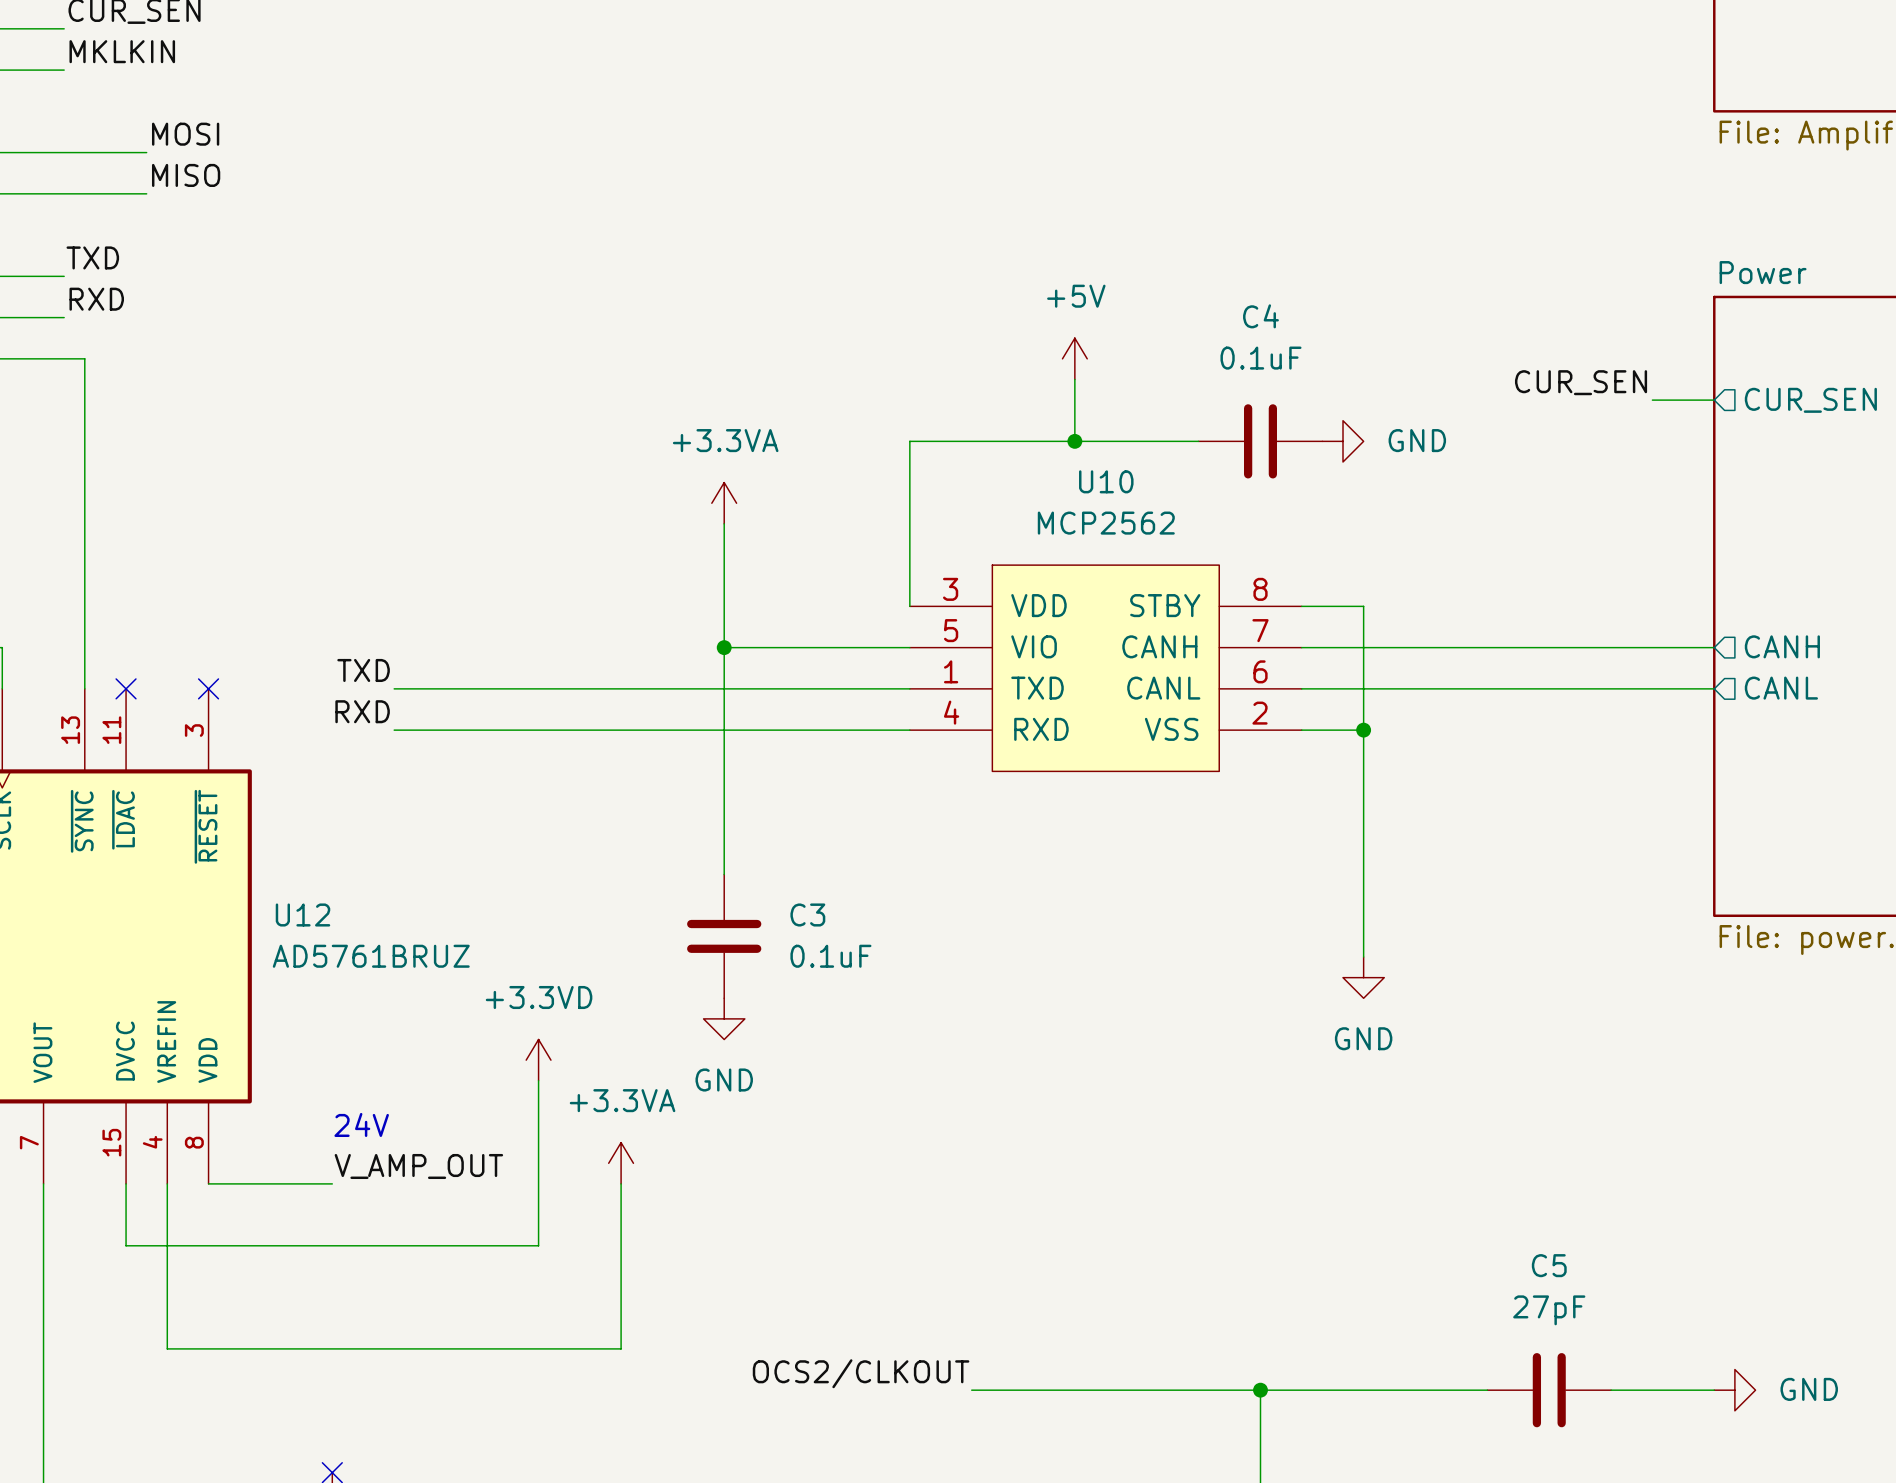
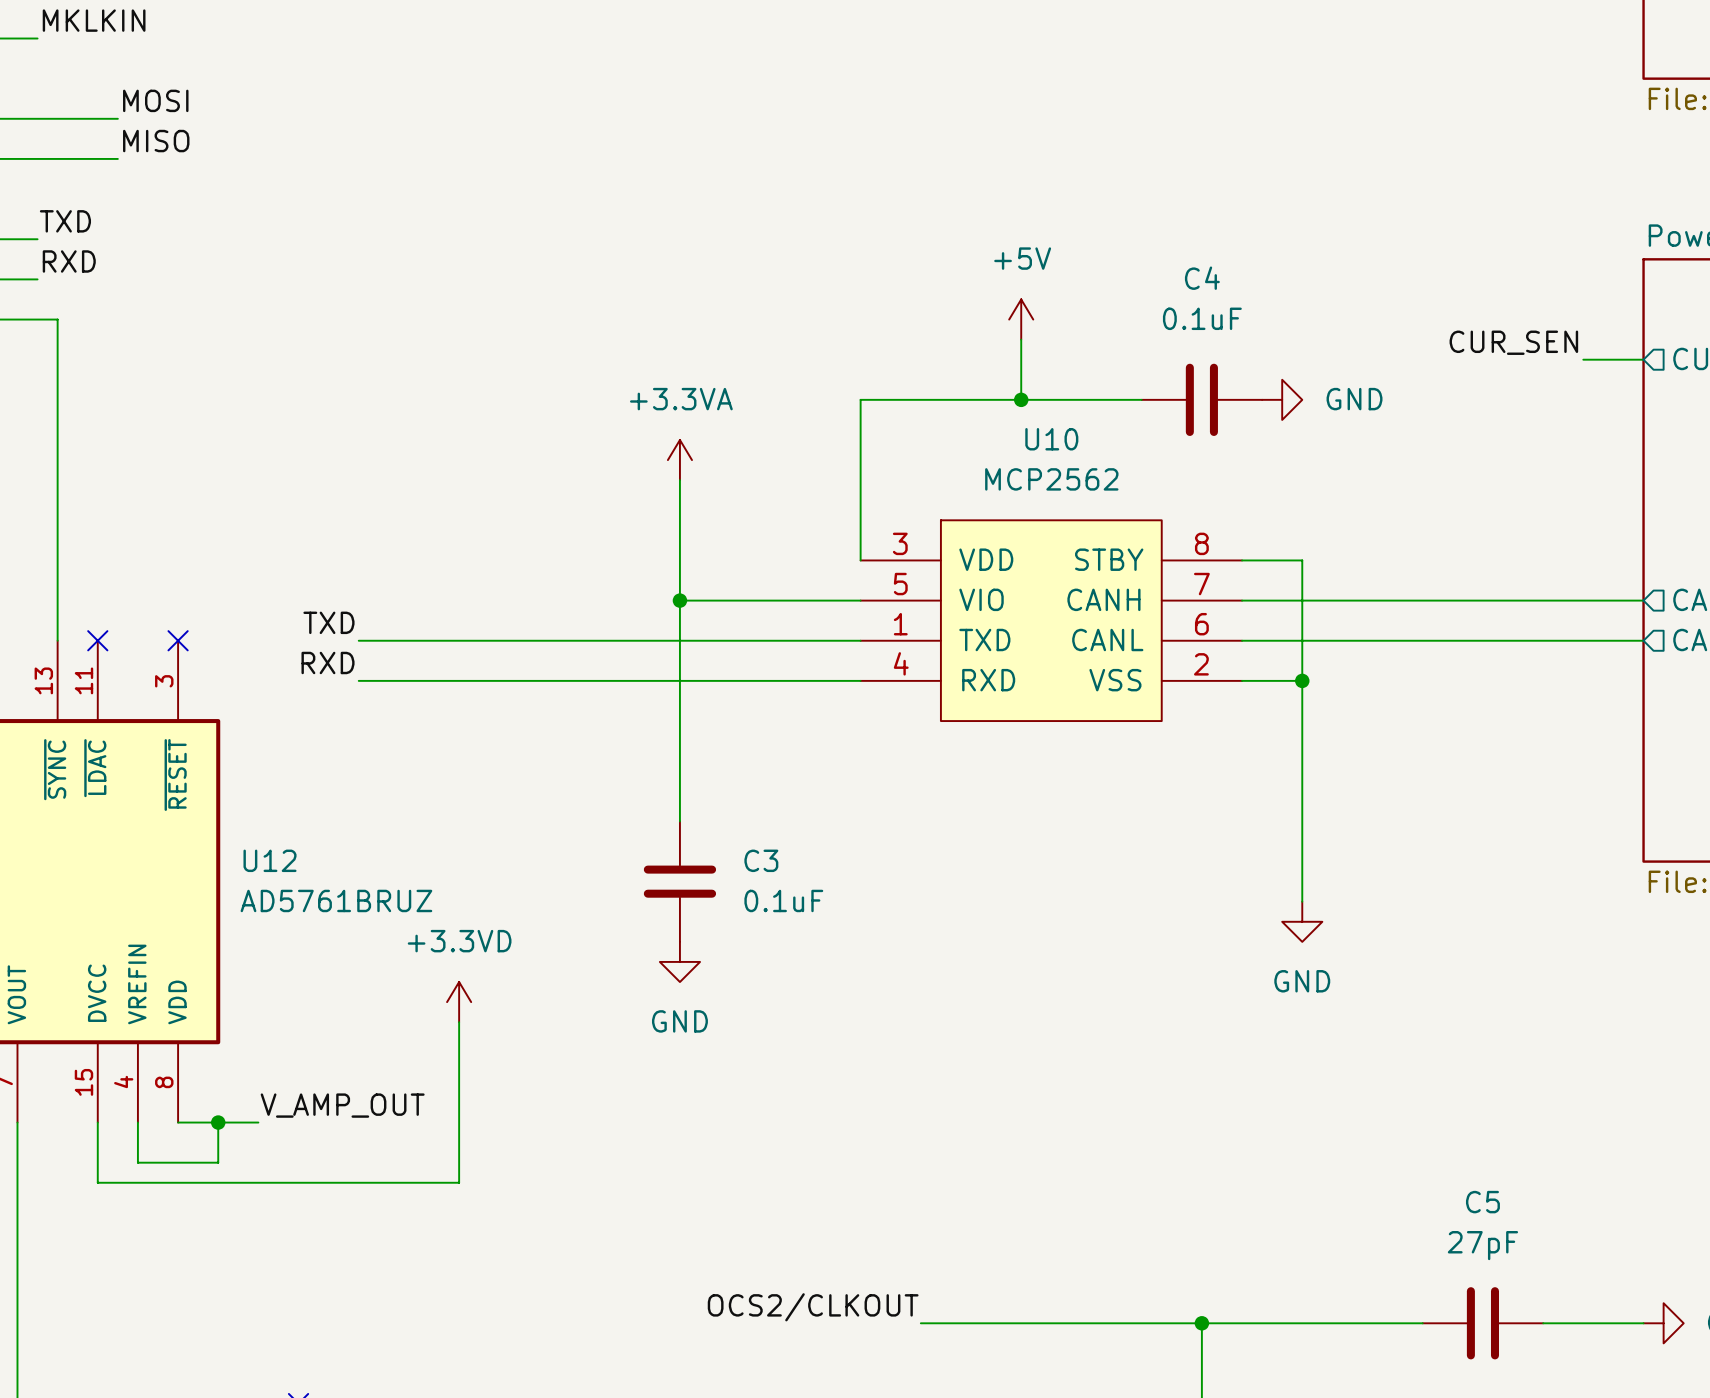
power symbol position: +3.3VD (538, 1060) -> +3.3VD (459, 1002)
wire: (538, 1080) (538, 1245) (497, 1245) -> (459, 1022) (459, 1182)
text: 24V (361, 1124) -> none
power symbol: +3.3VA (621, 1163) -> none
label position: V_AMP_OUT (418, 1166) -> V_AMP_OUT (342, 1105)
junction: none -> (218, 1122)
wire: (291, 1183) (332, 1183) -> none
wire: (621, 1183) (621, 1348) (167, 1348) (167, 1225) -> (218, 1122) (218, 1162) (137, 1162)

